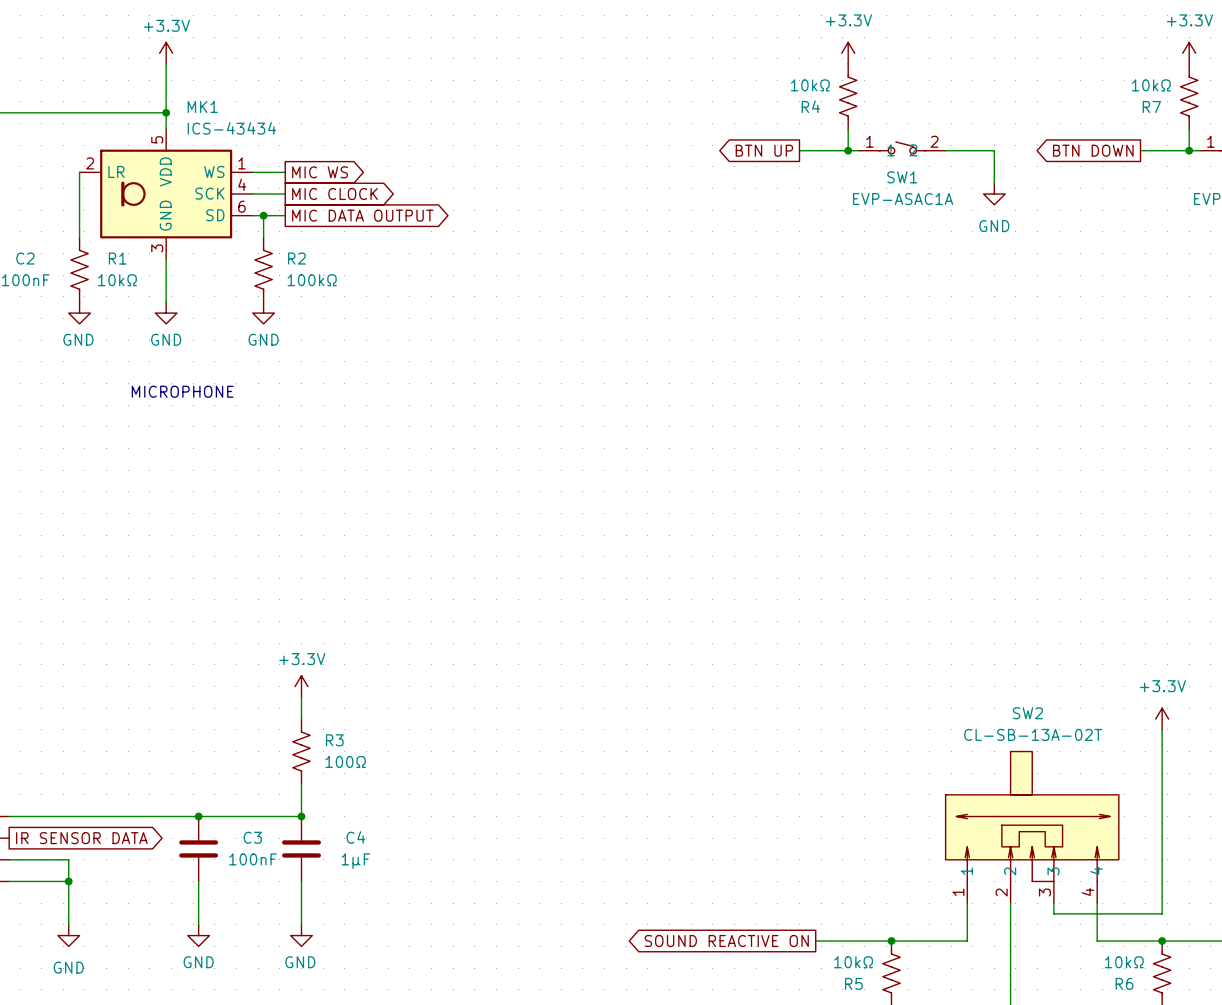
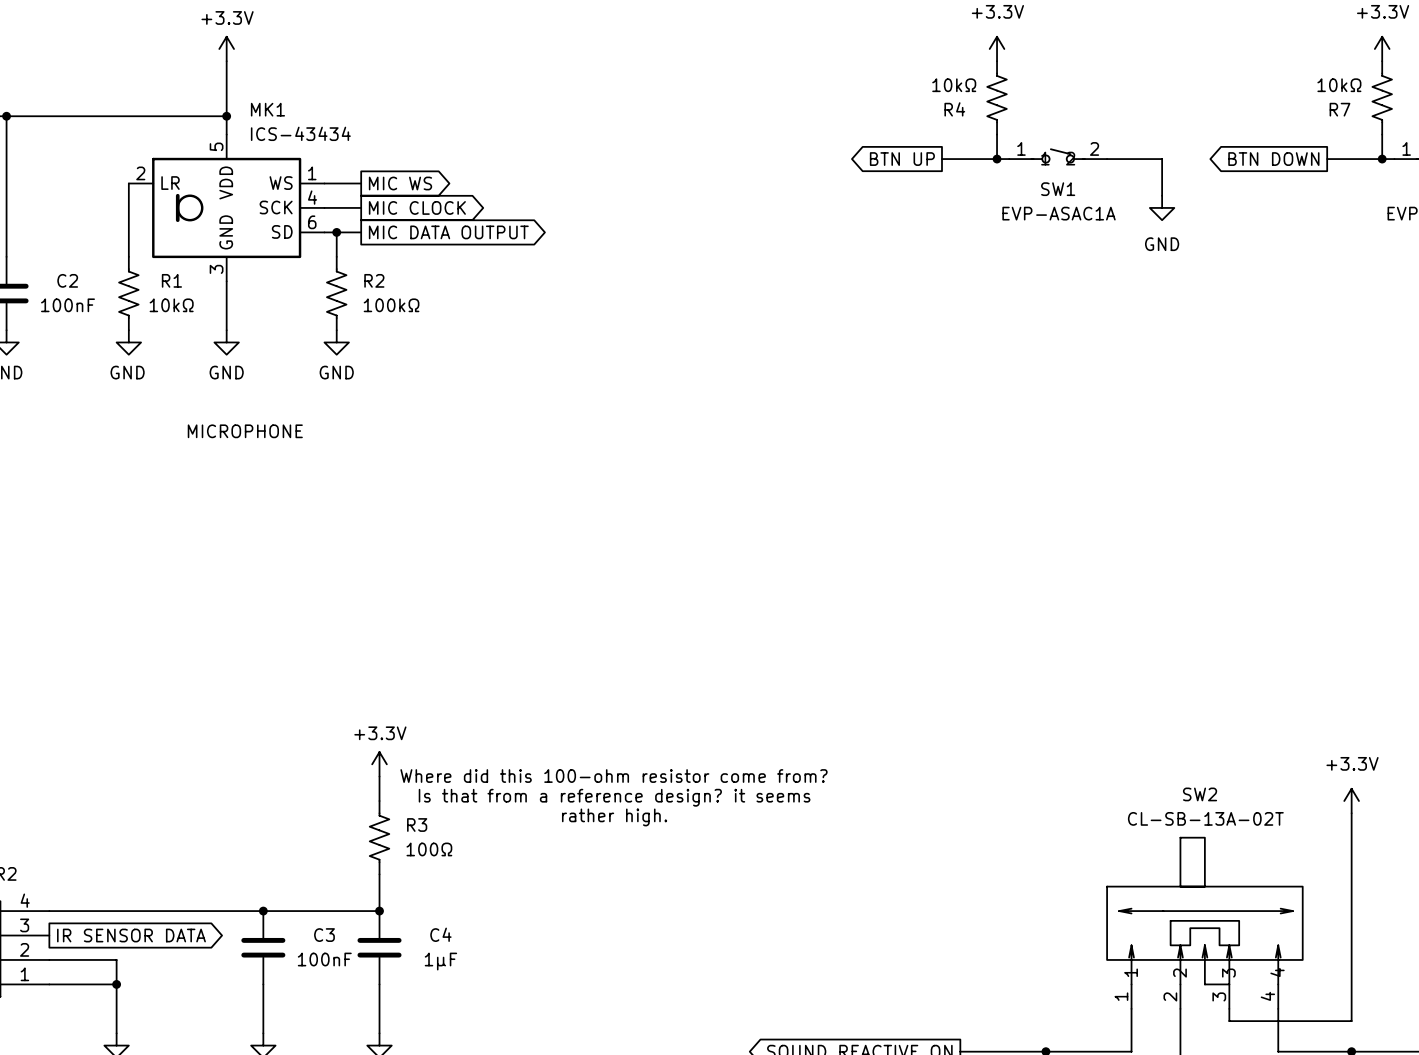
text: none -> Where did this 100-ohm resistor come from? (614, 776)
text: none -> Is that from a reference design? it seems (614, 797)
text: none -> rather high. (614, 817)

